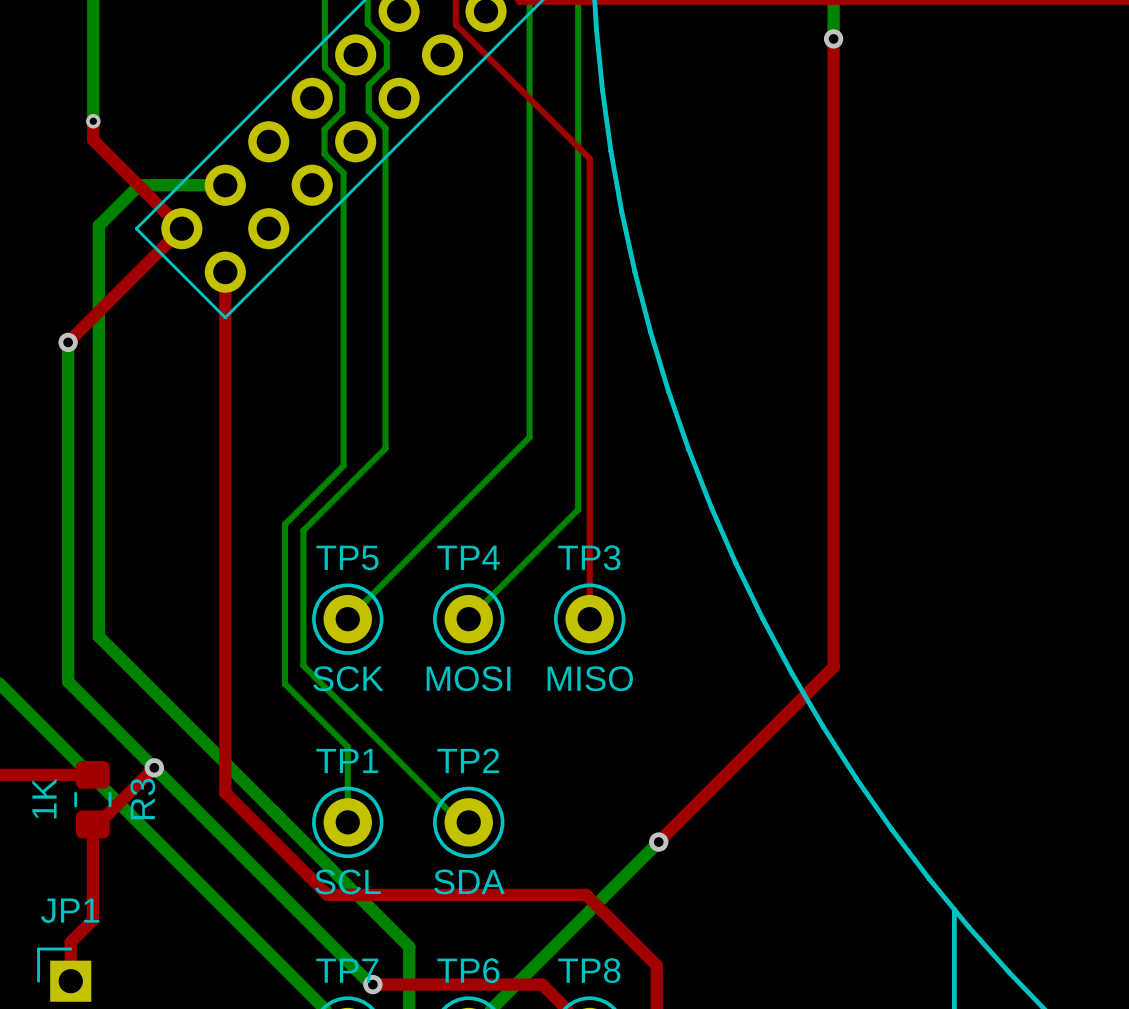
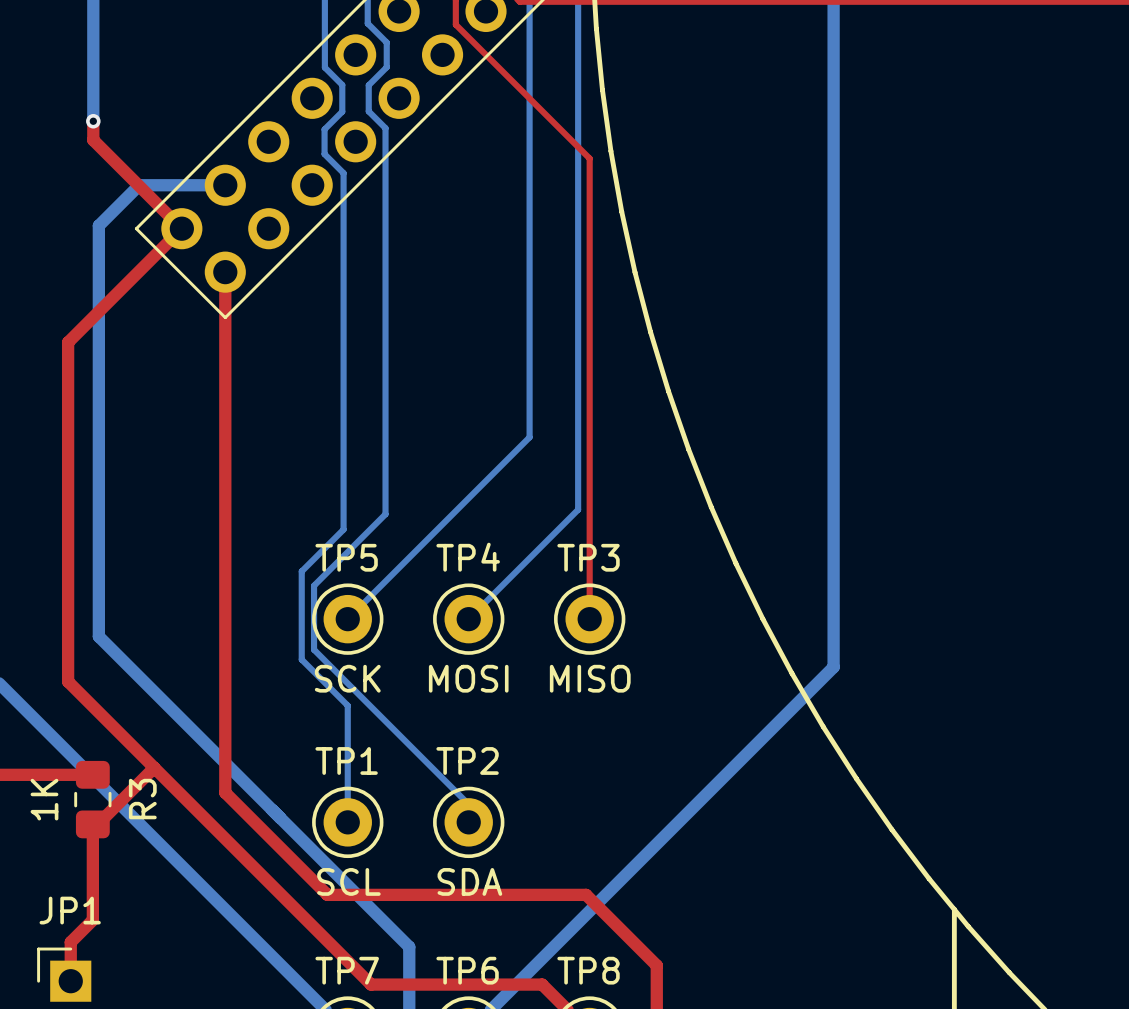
top track: (833, 38) (833, 667) (658, 842) -> none
bottom track: none -> (833, 38) (833, 667) (658, 842)
via: (833, 38) -> none
top track: none -> (68, 342) (68, 681) (371, 984)
bottom track: (68, 342) (68, 681) (371, 984) -> none
via: (68, 342) -> none
bottom track: (385, 448) (303, 530) (303, 665) (460, 822) (468, 822) -> (385, 448) (385, 514) (314, 585) (314, 649) (468, 804) (468, 822)
bottom track: (343, 465) (285, 524) (285, 684) (347, 746) -> (343, 465) (343, 529) (301, 571) (301, 659) (347, 705) (347, 746)
via: (154, 767) -> none
via: (658, 842) -> none
via: (372, 984) -> none

